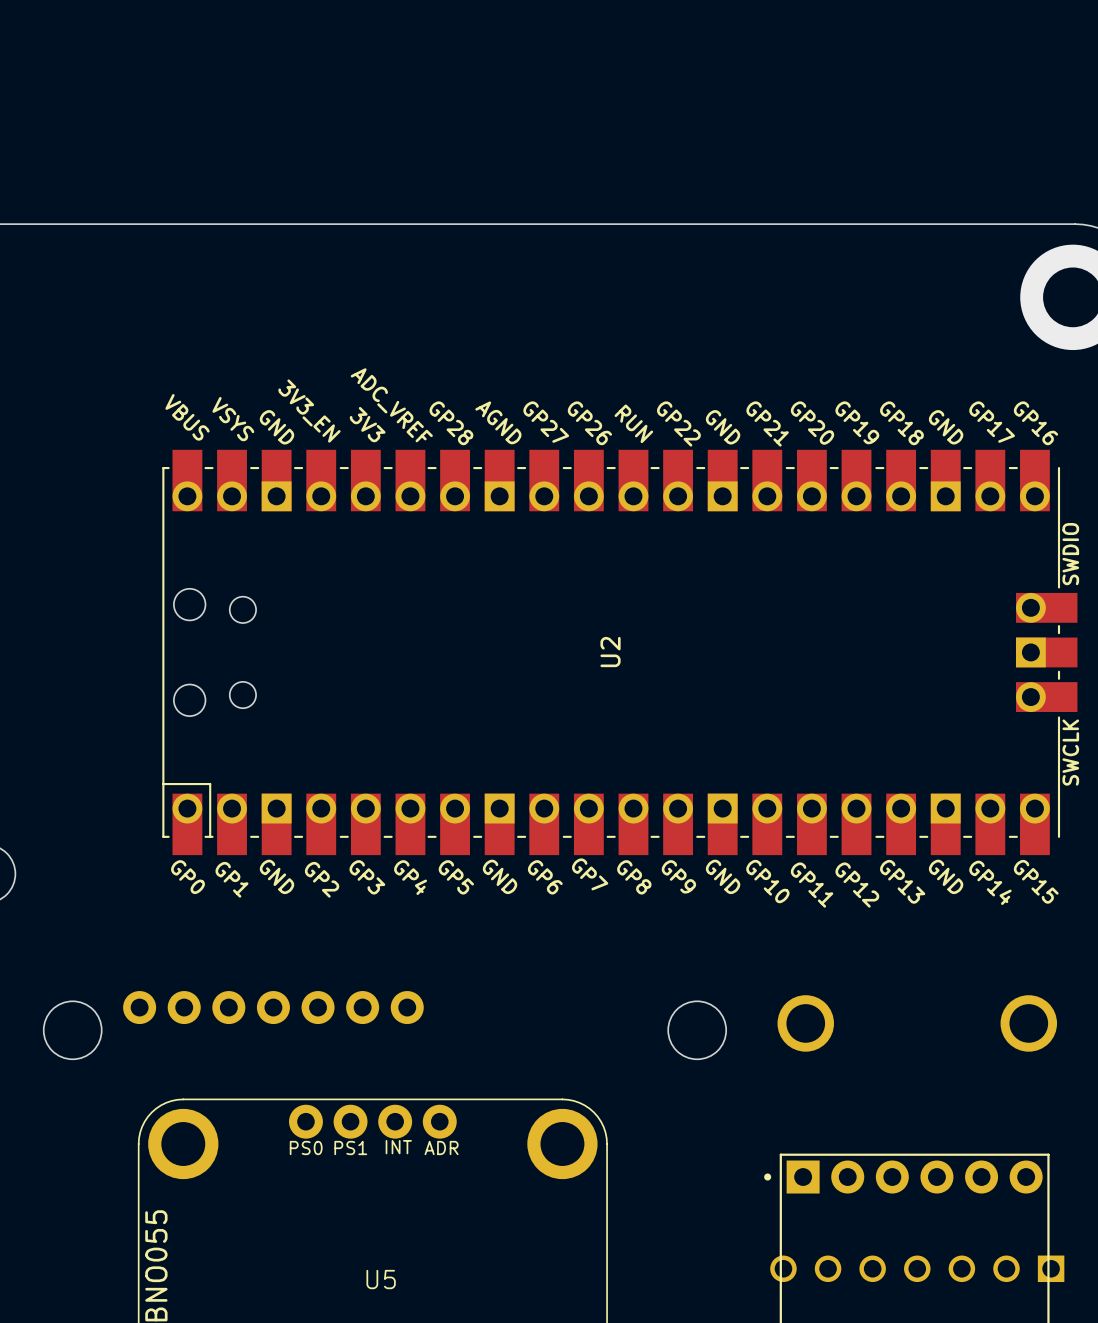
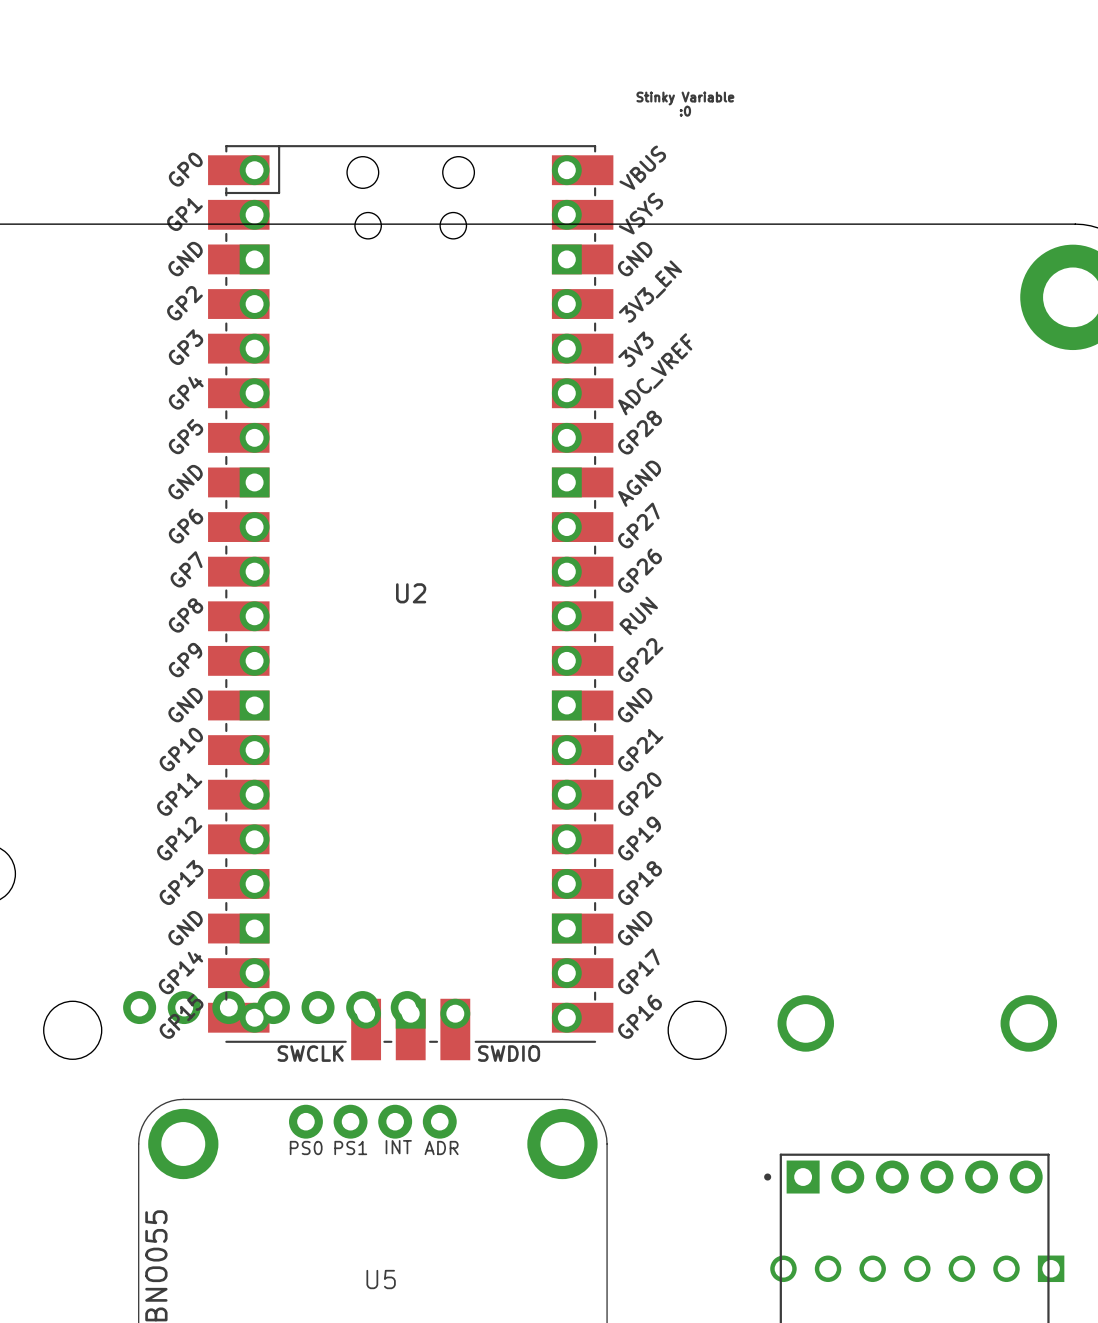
text: none -> Stinky Variable (685, 98)
text: none -> :0 (685, 111)
U2 rotation: 0° (619, 652) -> 90° clockwise (410, 602)

